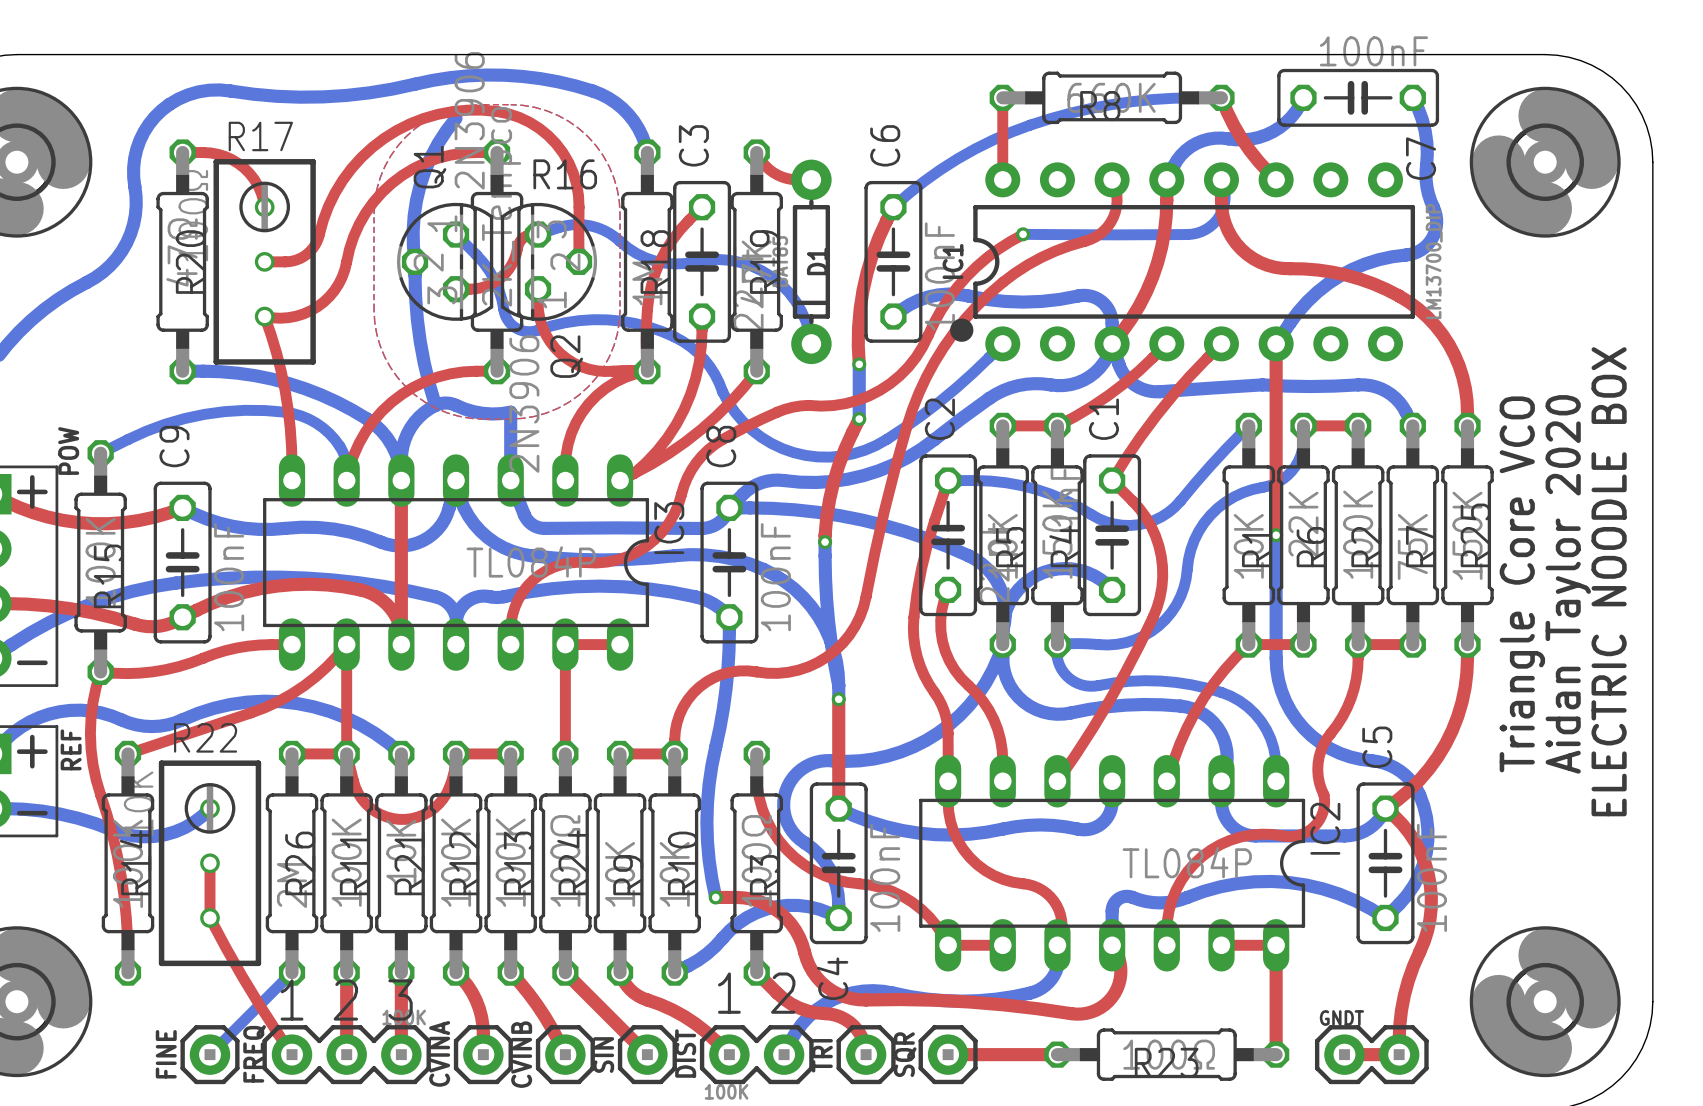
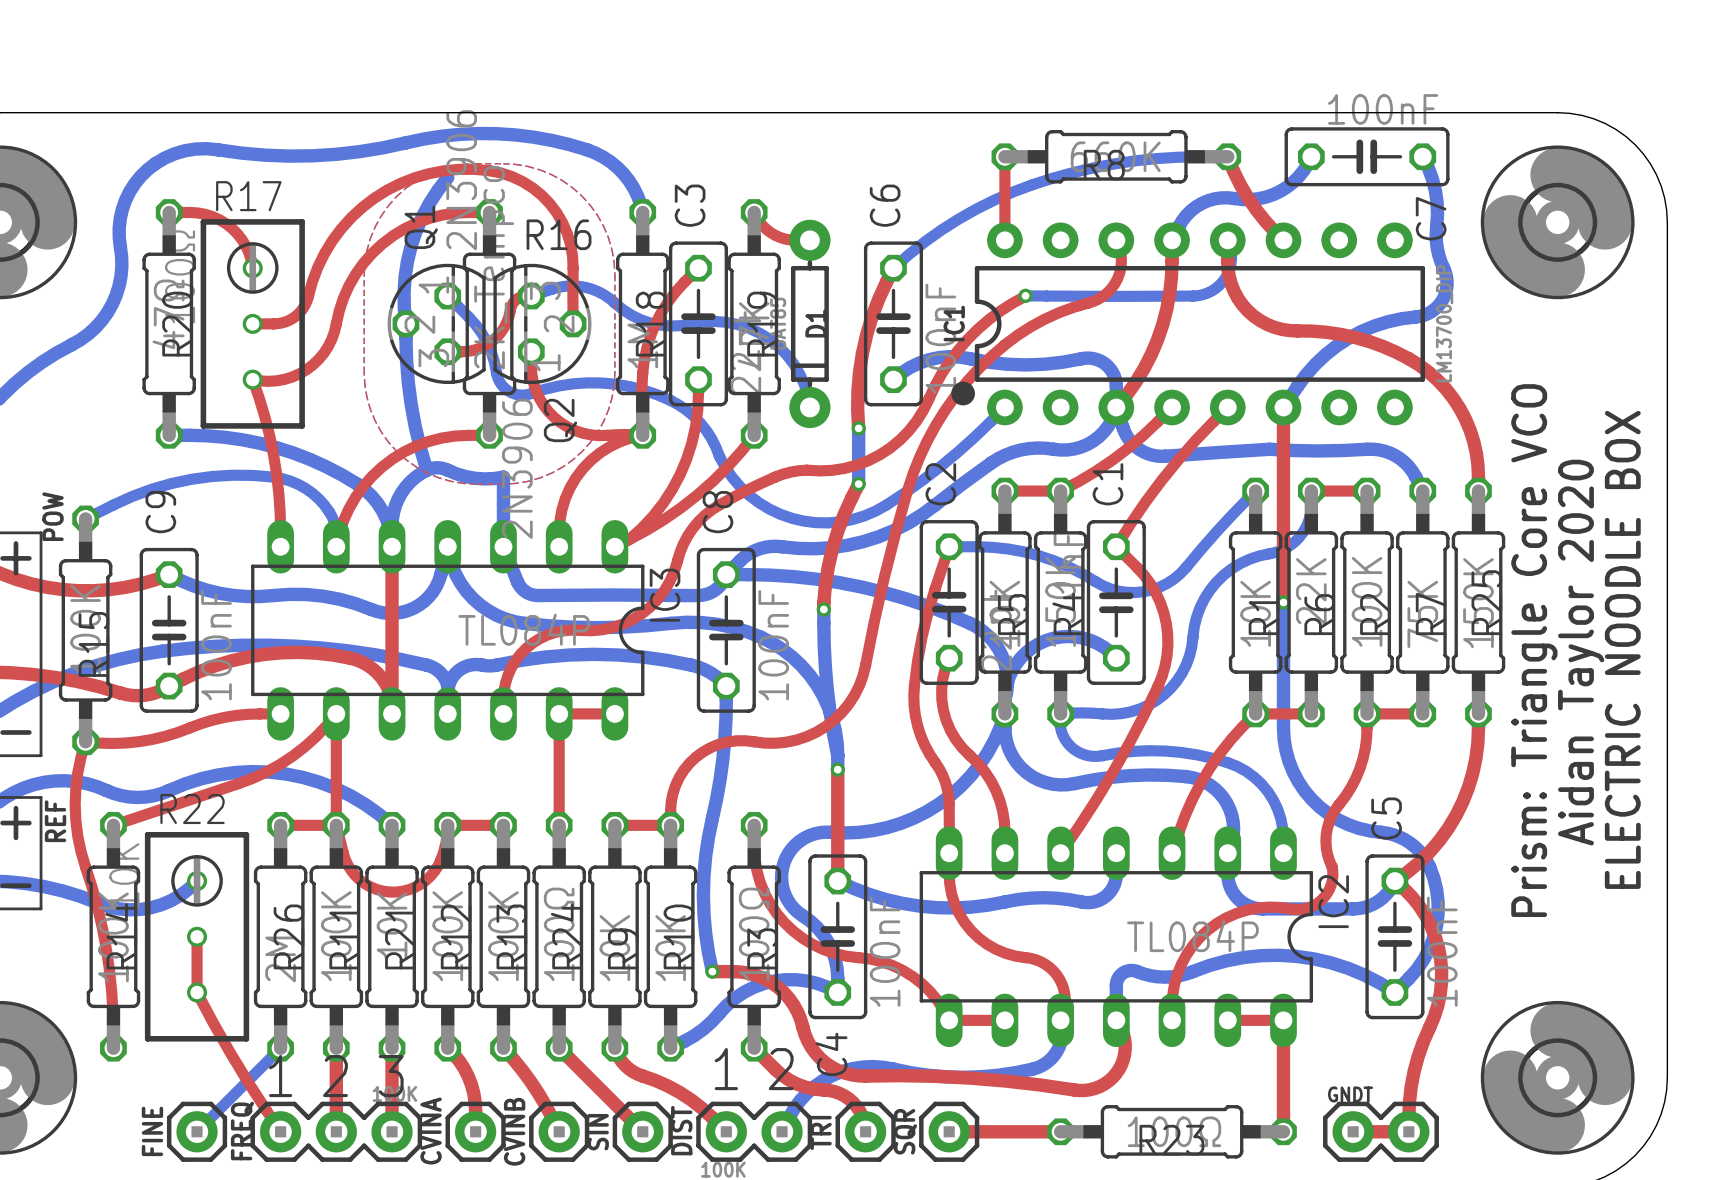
text: Triangle Core VCO (1522, 584) -> Prism: Triangle Core VCO (1534, 650)

